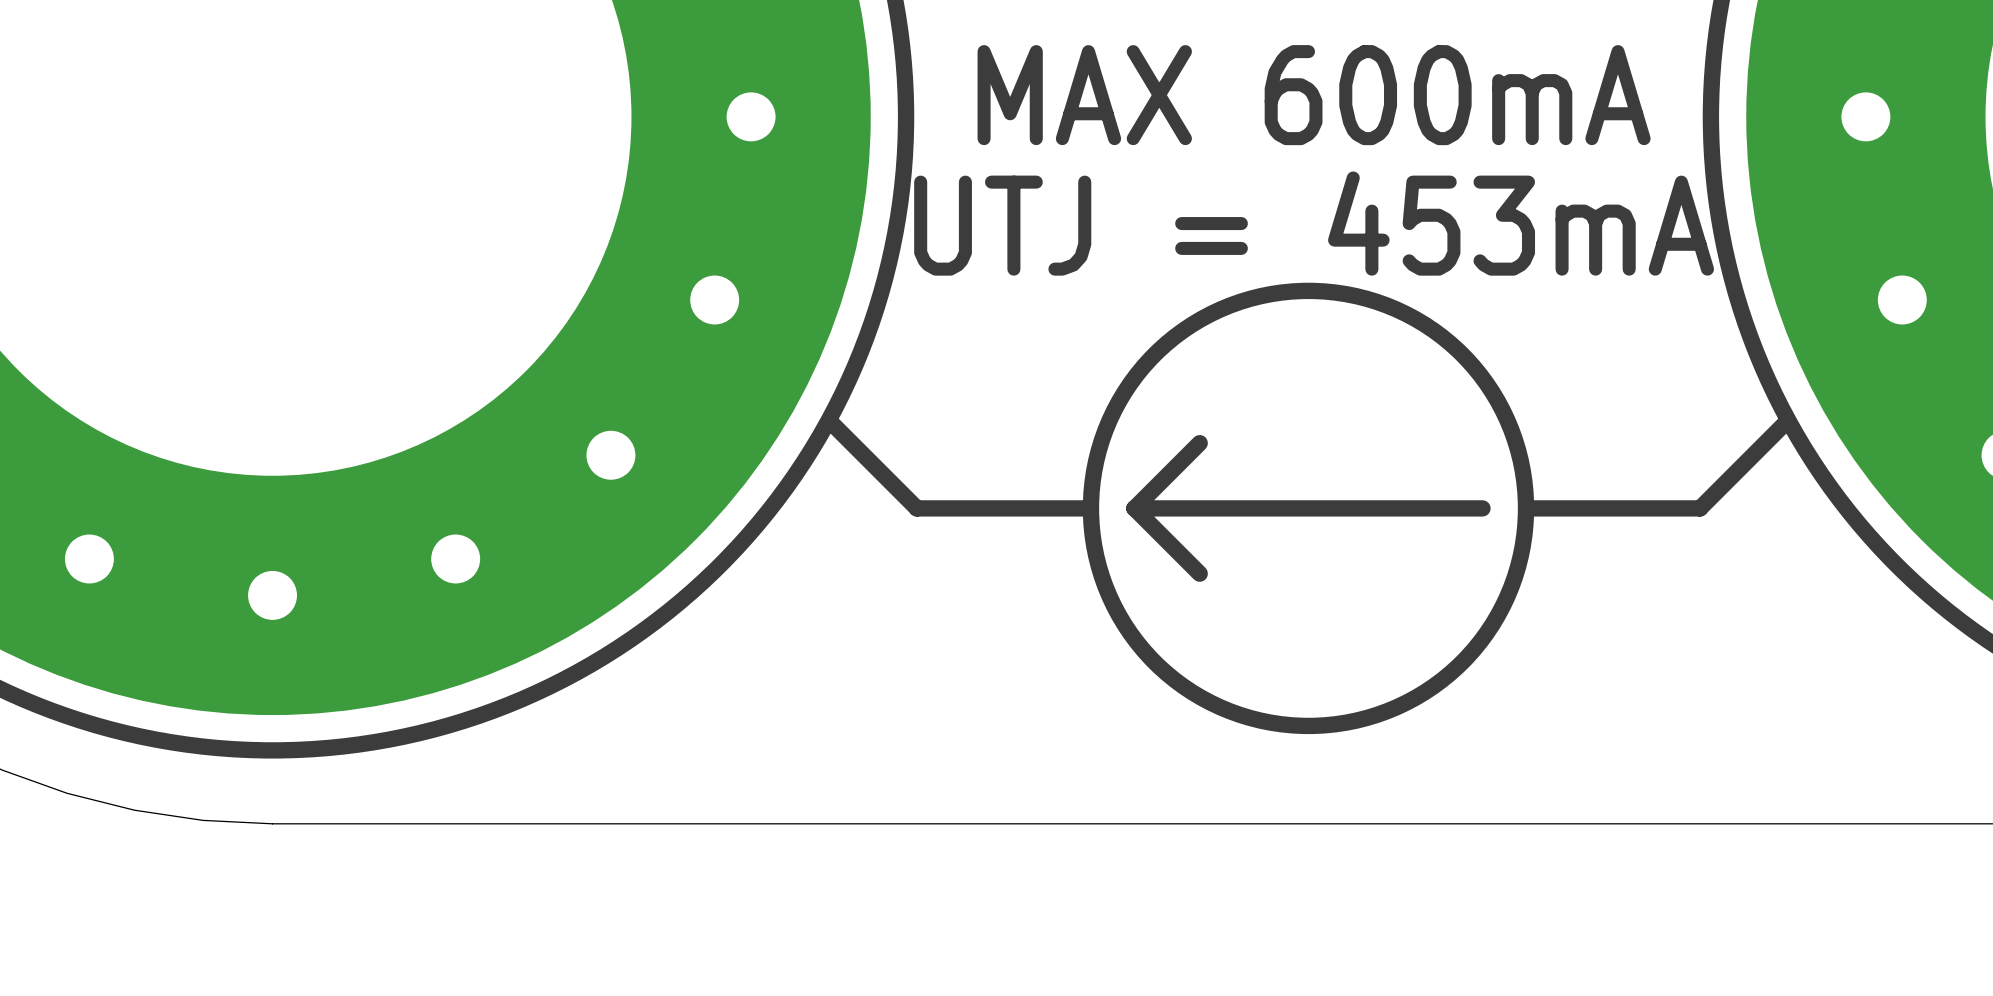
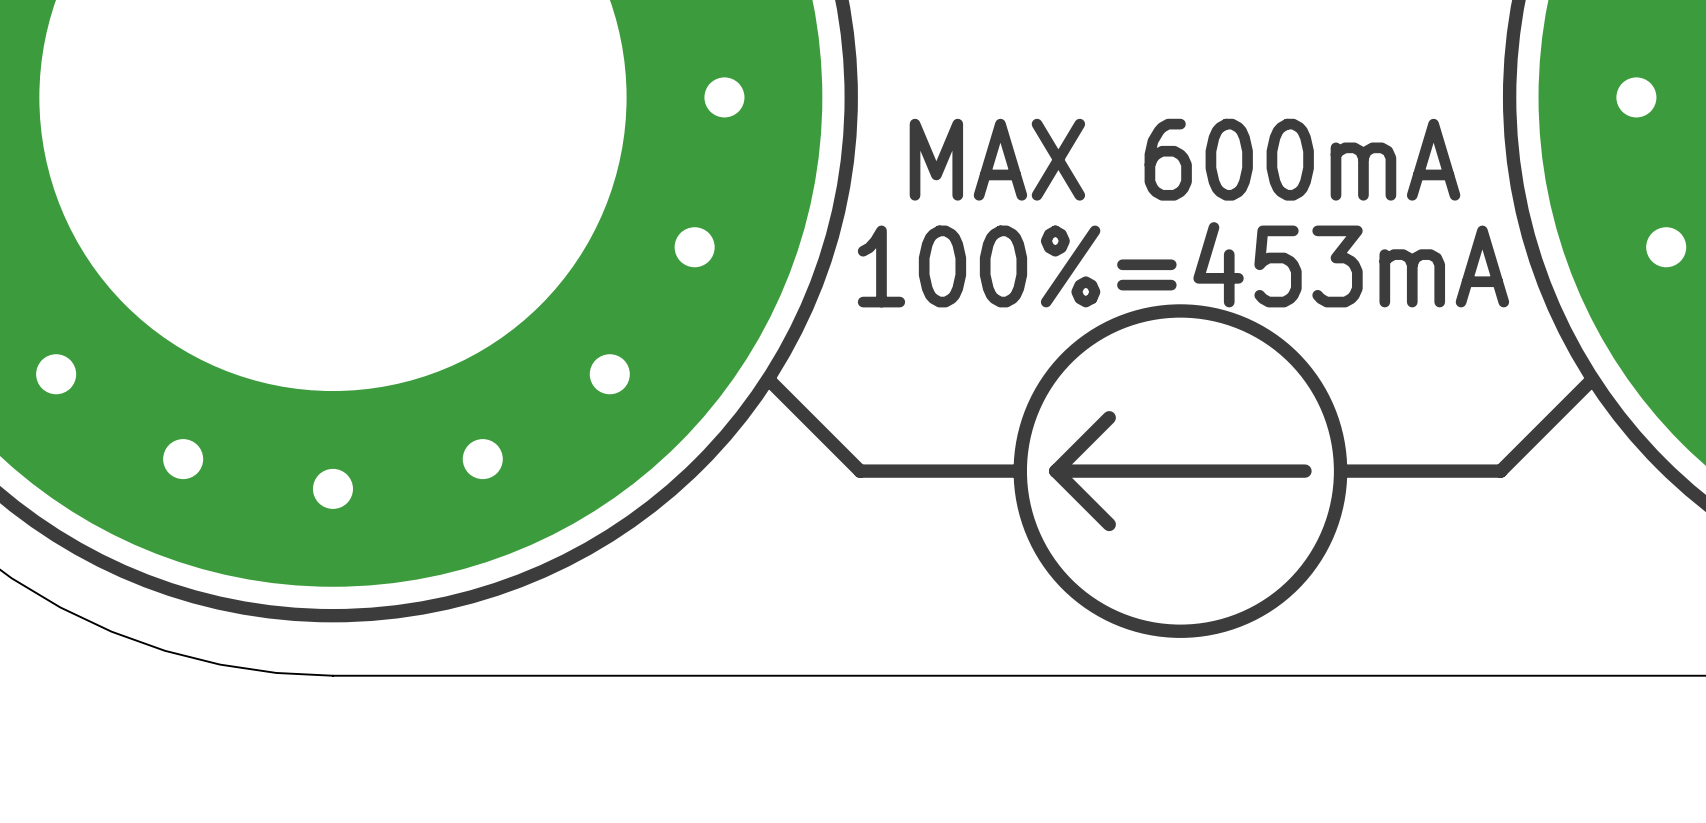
text position: MAX 600mA (1314, 95) -> MAX 600mA (1185, 159)
text: UTJ = 453mA (1314, 223) -> 100%=453mA (1183, 264)
drawing shape: [1082, 282, 1535, 735] -> [1013, 304, 1348, 638]
line: (829, 421) (916, 508) (1090, 508) -> none
line: (1787, 421) (1700, 508) (1526, 508) -> none
line: (1199, 443) (1134, 508) -> (1109, 417) (1055, 471)
line: none -> (771, 382) (860, 471) (1020, 471)
line: none -> (1589, 382) (1500, 471) (1340, 471)
line: (1134, 508) (1199, 573) -> (1055, 471) (1109, 524)
line: (1134, 508) (1482, 508) -> none
line: none -> (1055, 471) (1304, 471)

